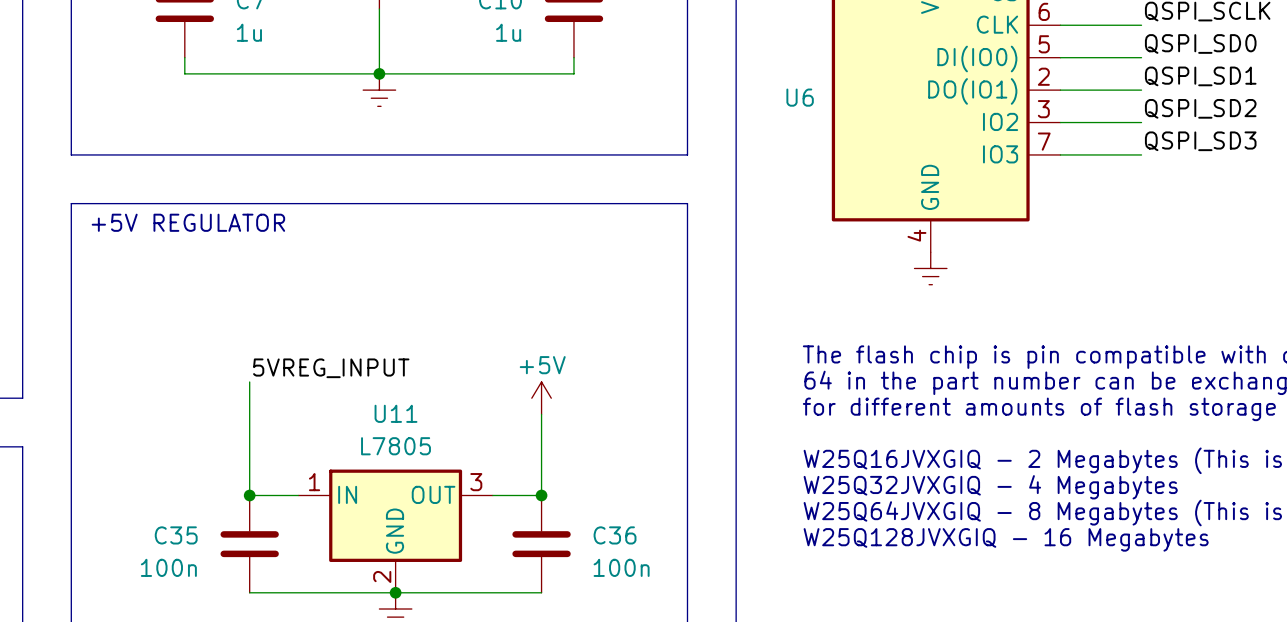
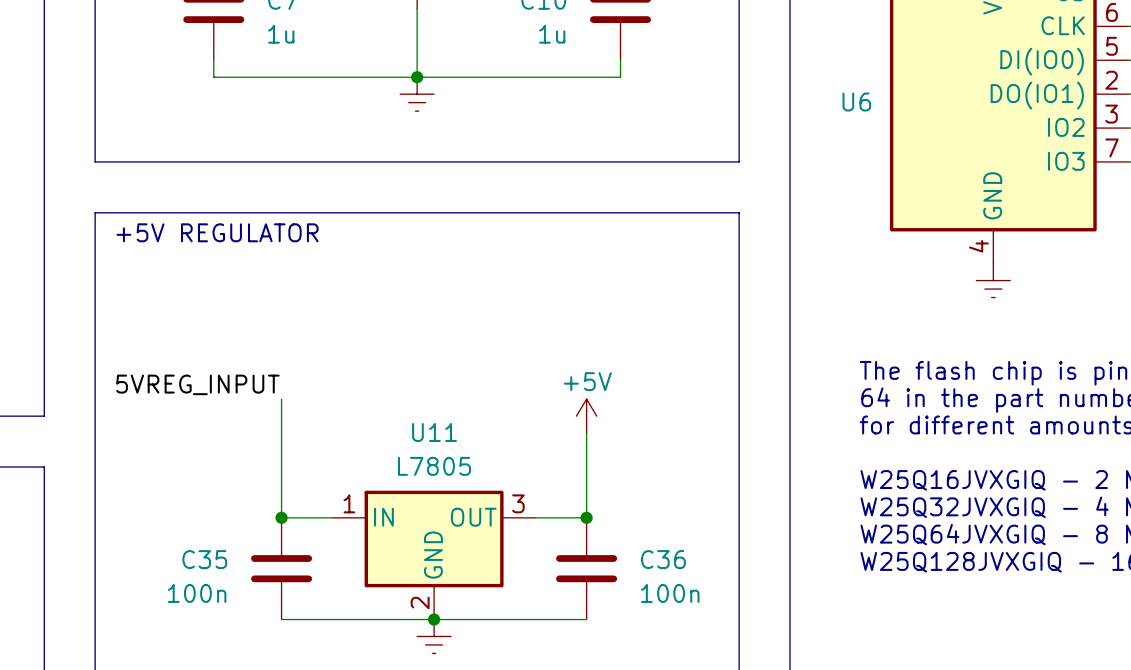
label position: 5VREG_INPUT (331, 368) -> 5VREG_INPUT (197, 384)

